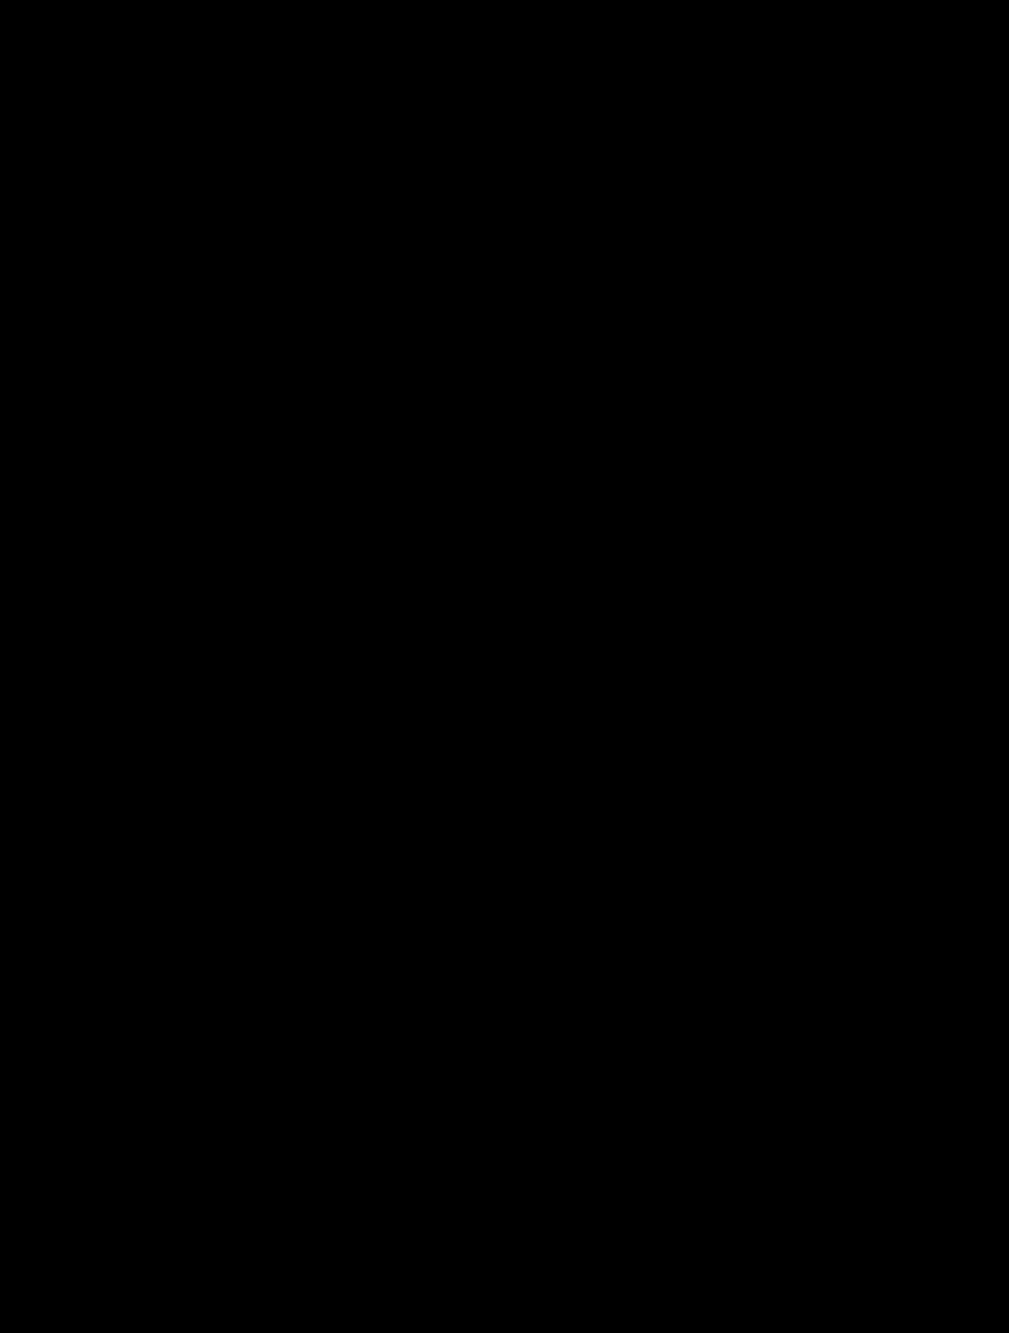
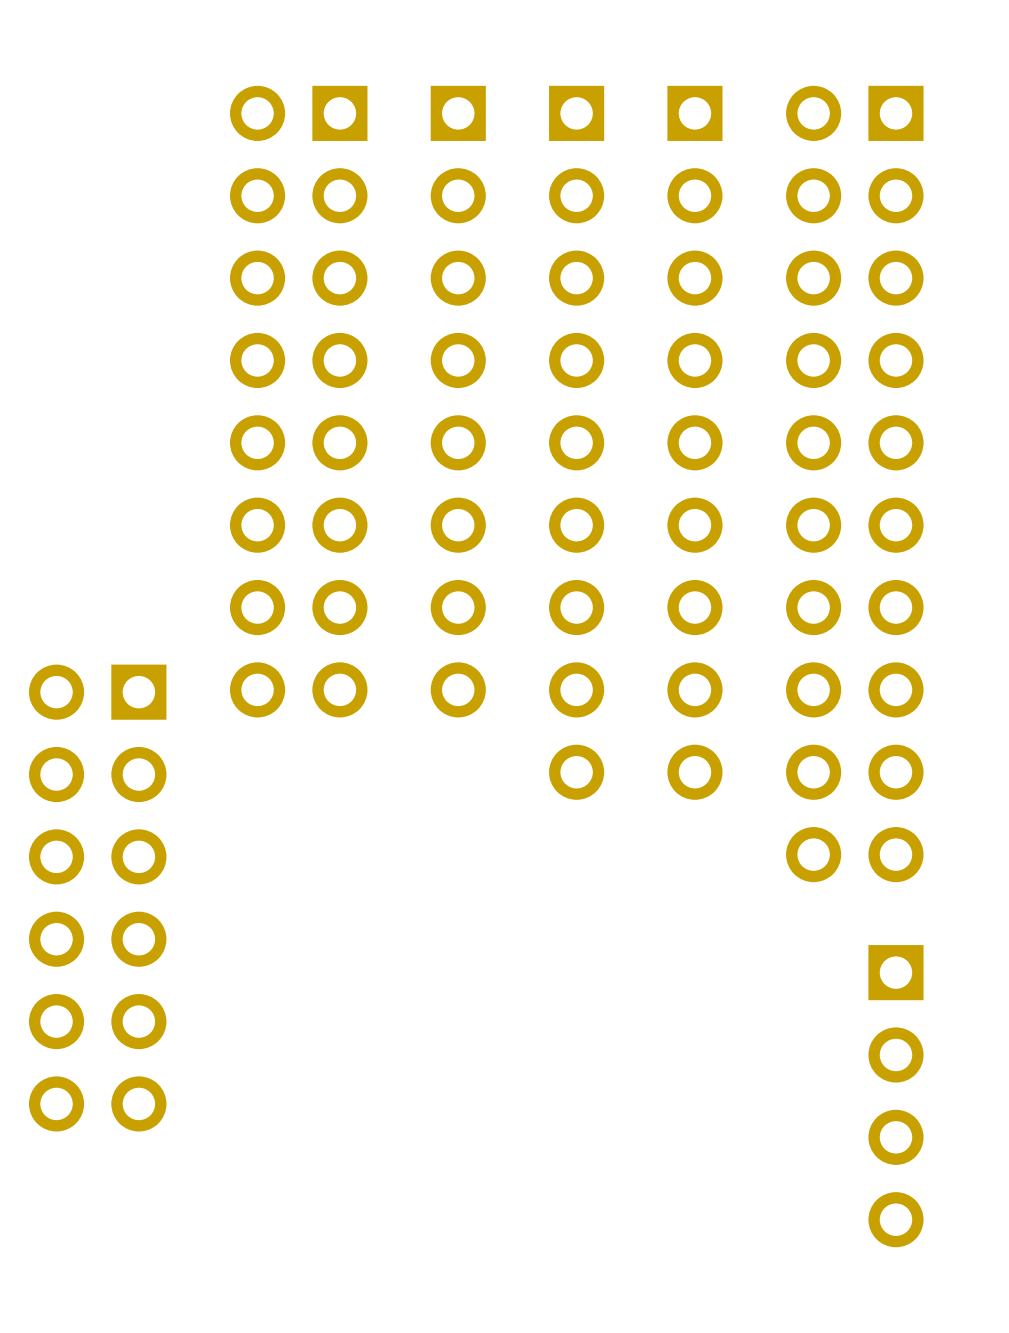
part: none -> (298, 401)
part: none -> (458, 401)
part: none -> (576, 442)
part: none -> (694, 442)
part: none -> (854, 484)
part: none -> (97, 898)
part: none -> (895, 1096)

